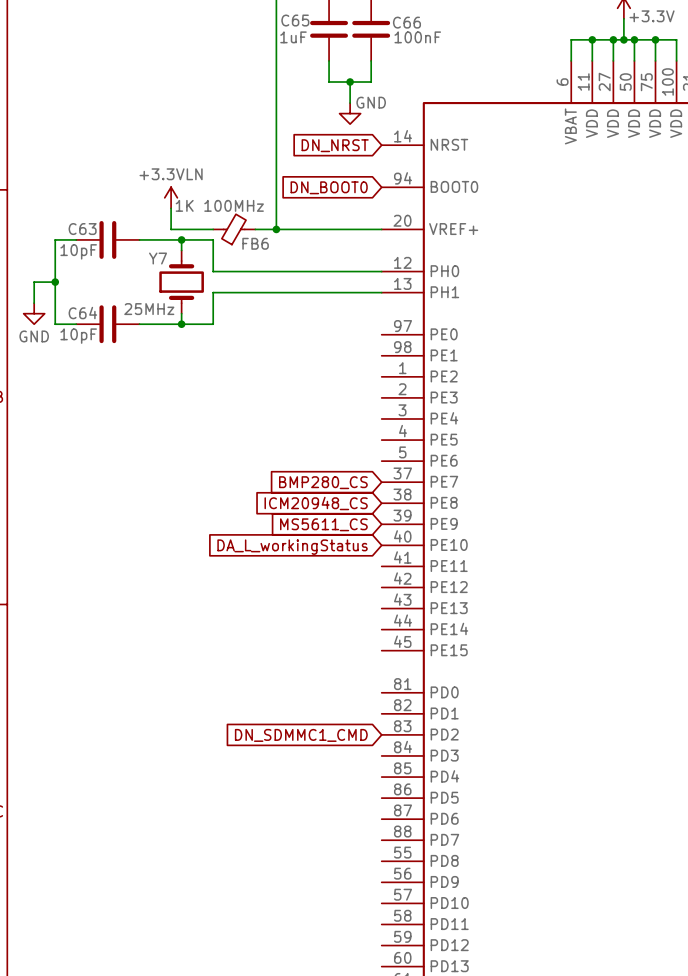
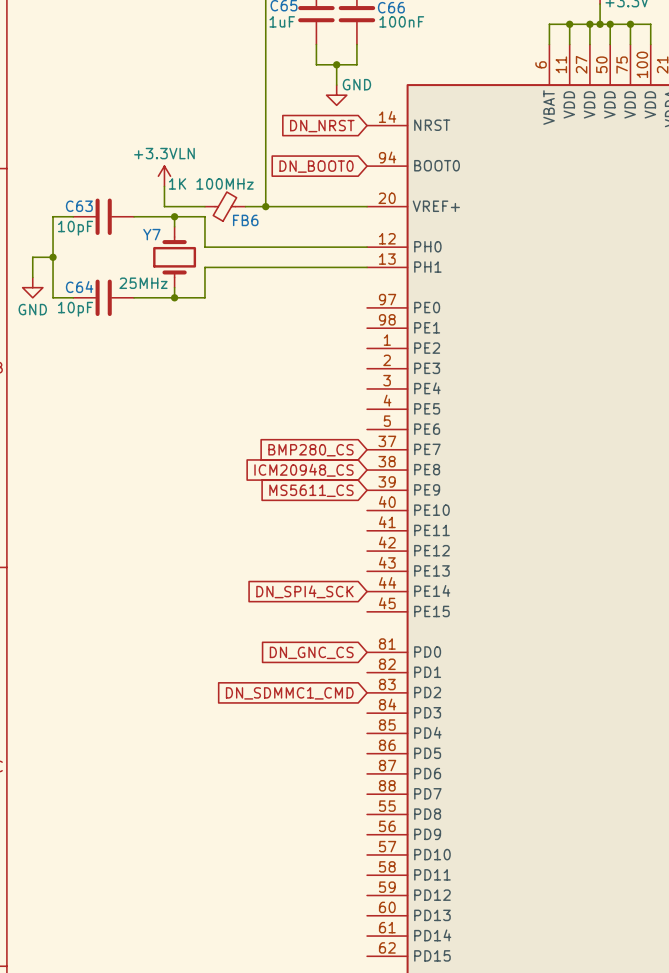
global label: DA_L_workingStatus (292, 547) -> none
global label: none -> DN_SPI4_SCK (304, 591)
global label: none -> DN_GNC_CS (311, 652)

